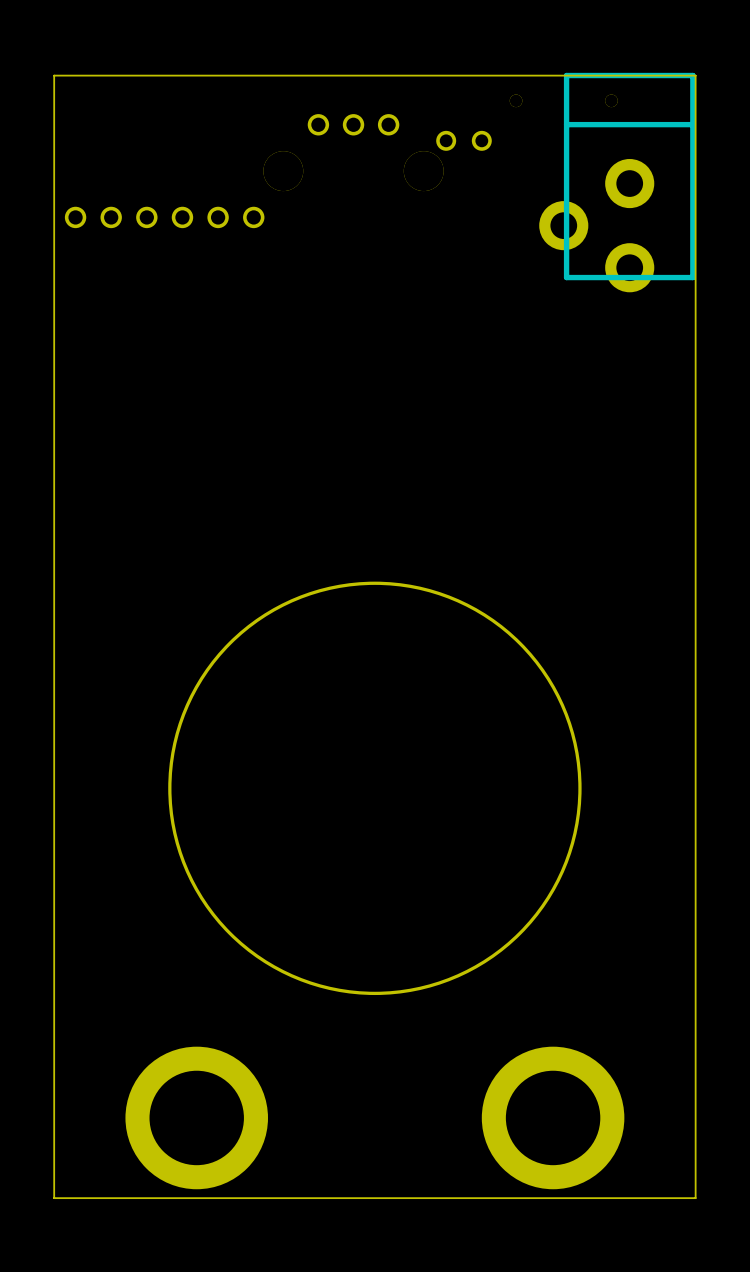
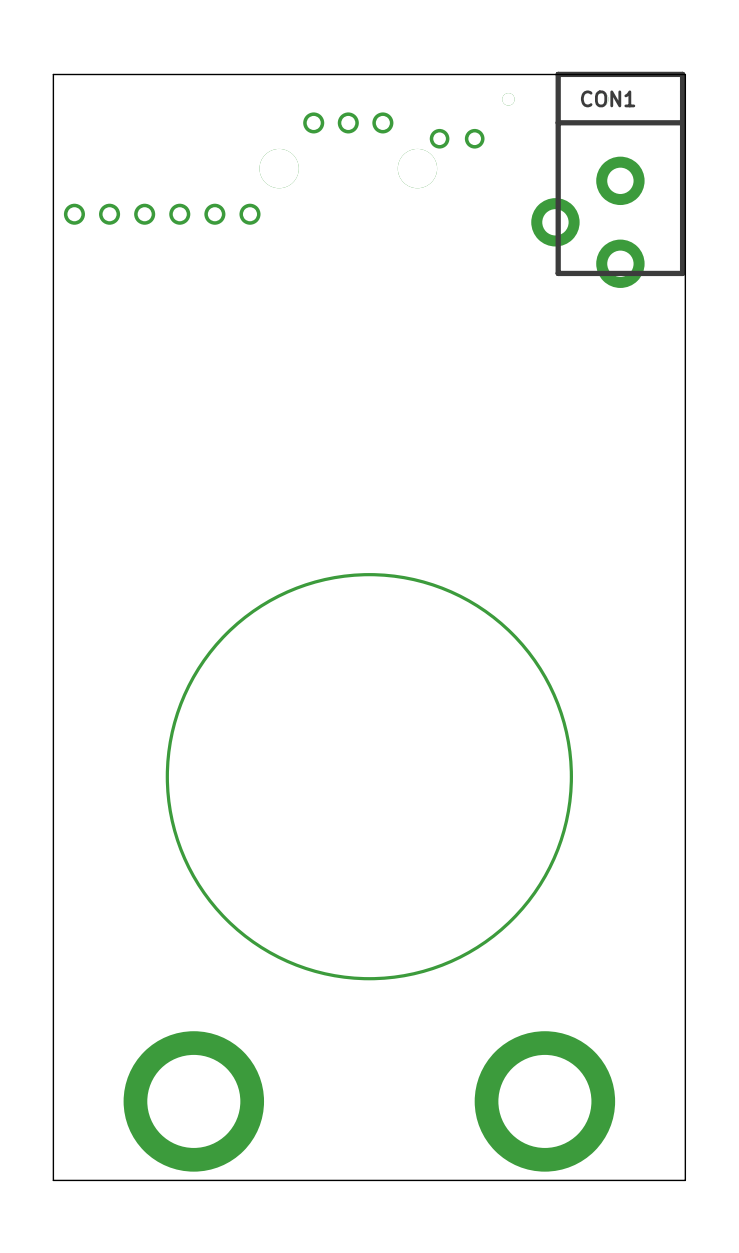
CON1 name: none -> CON1 (608, 98)

